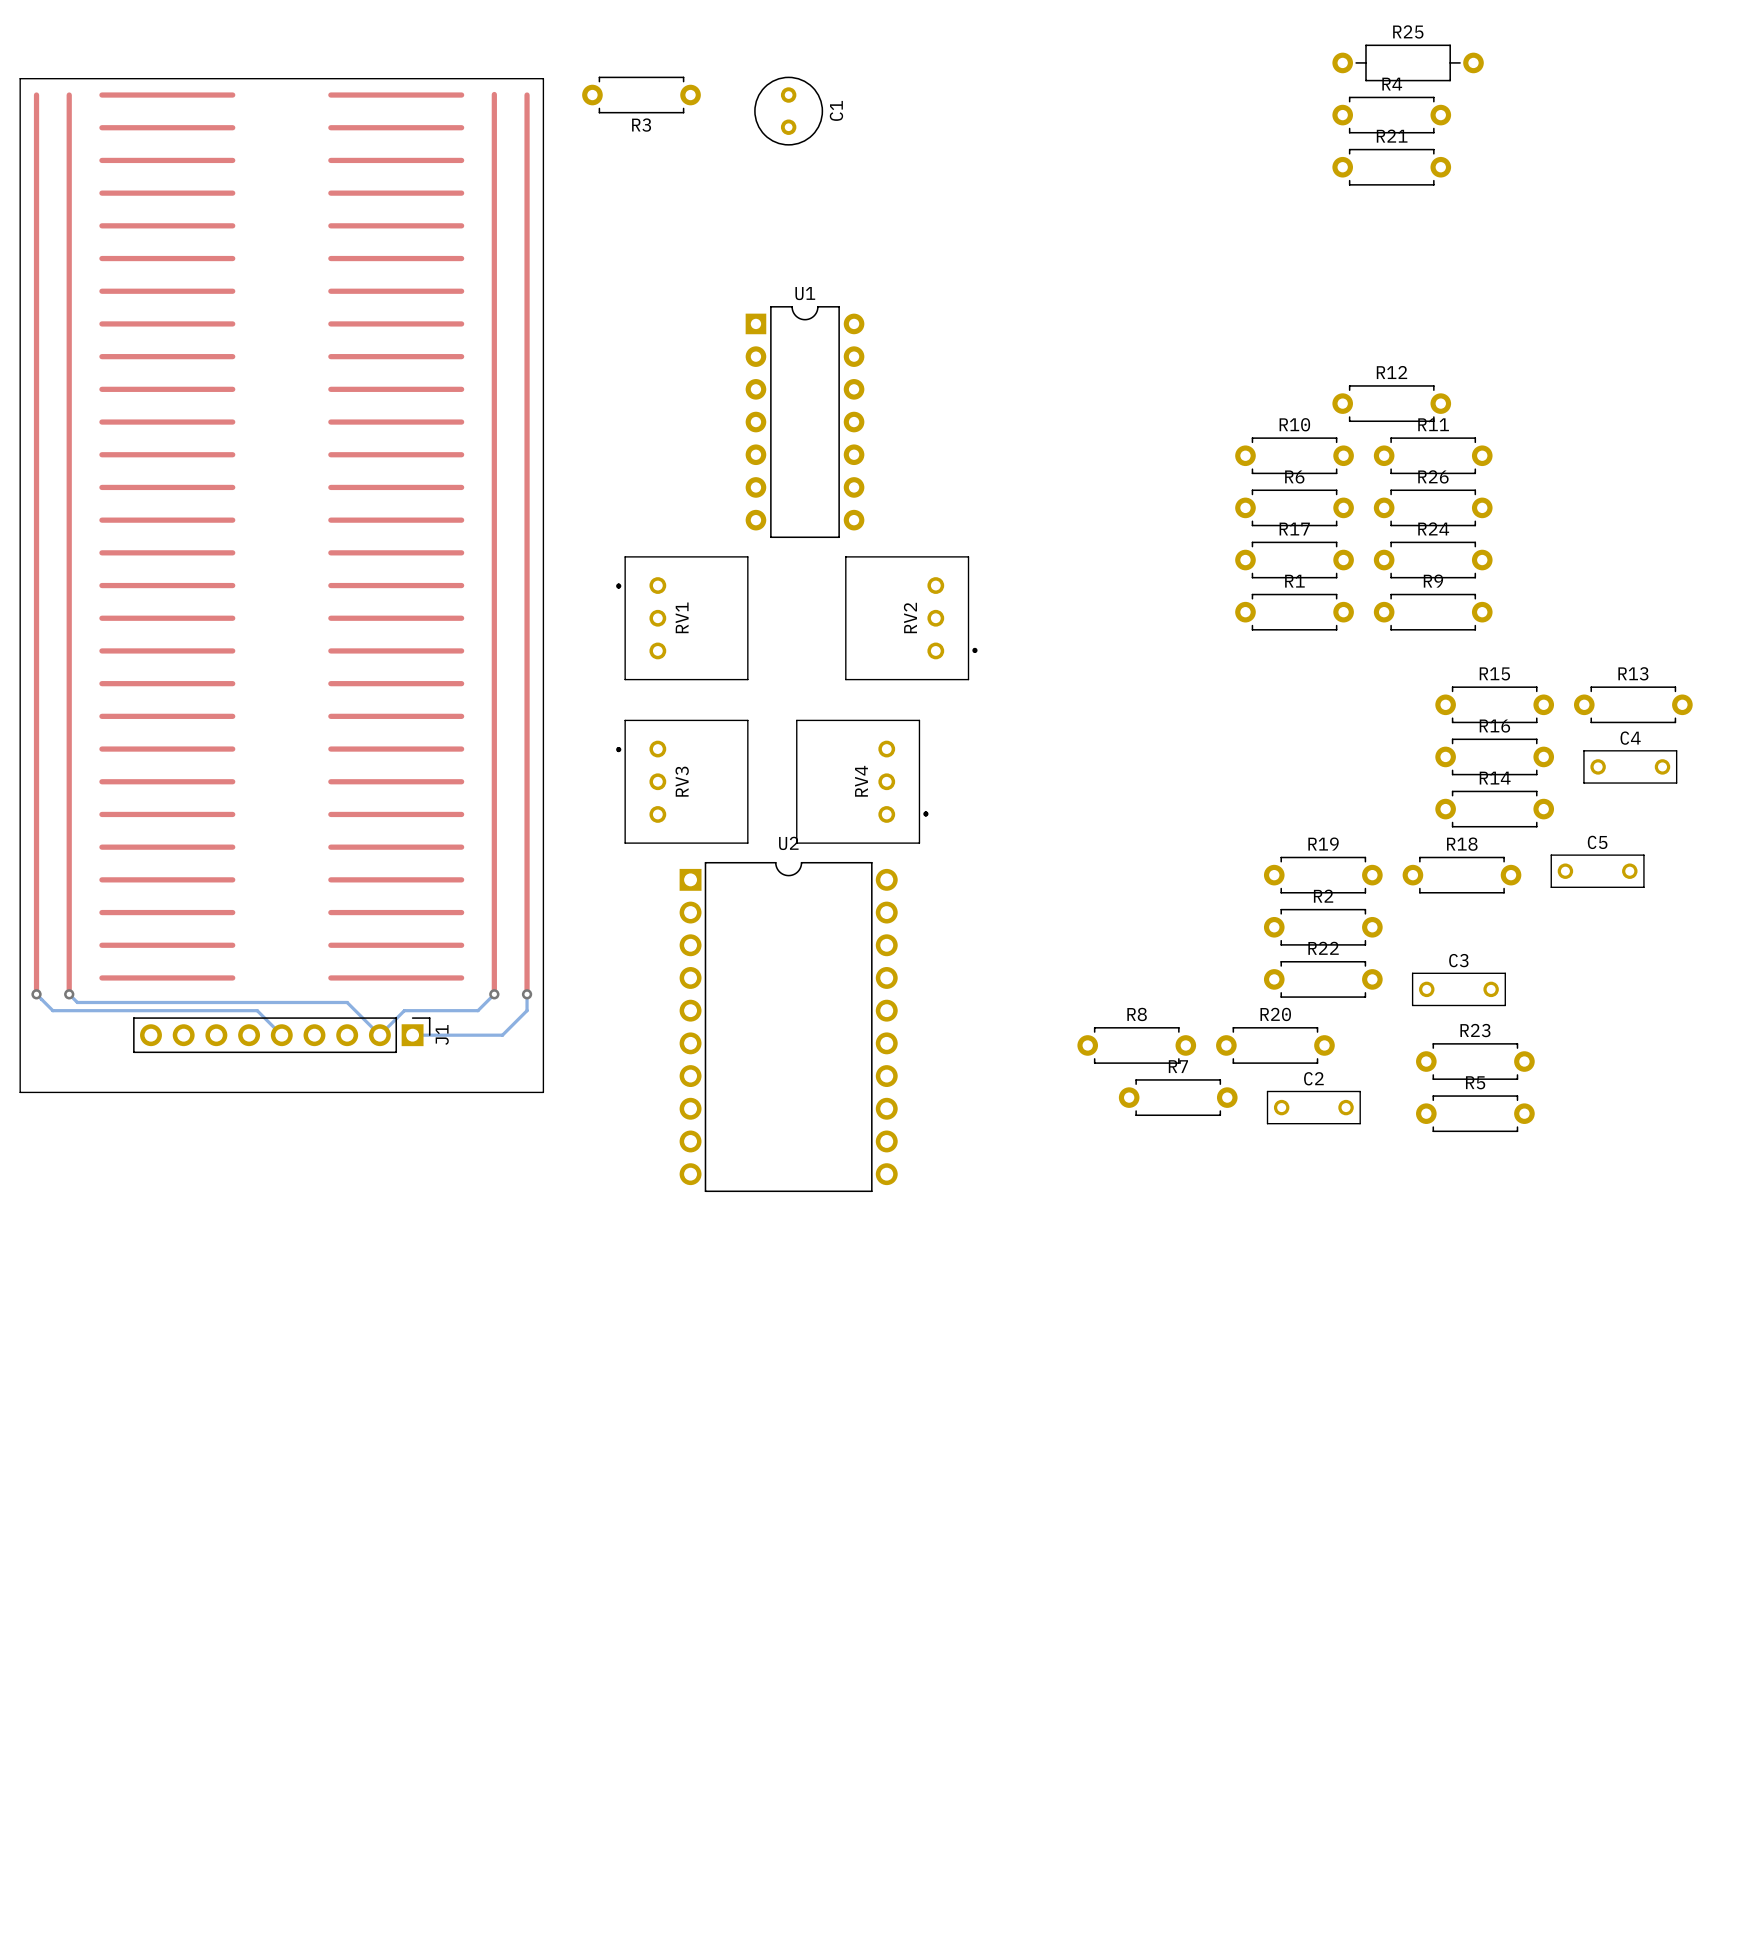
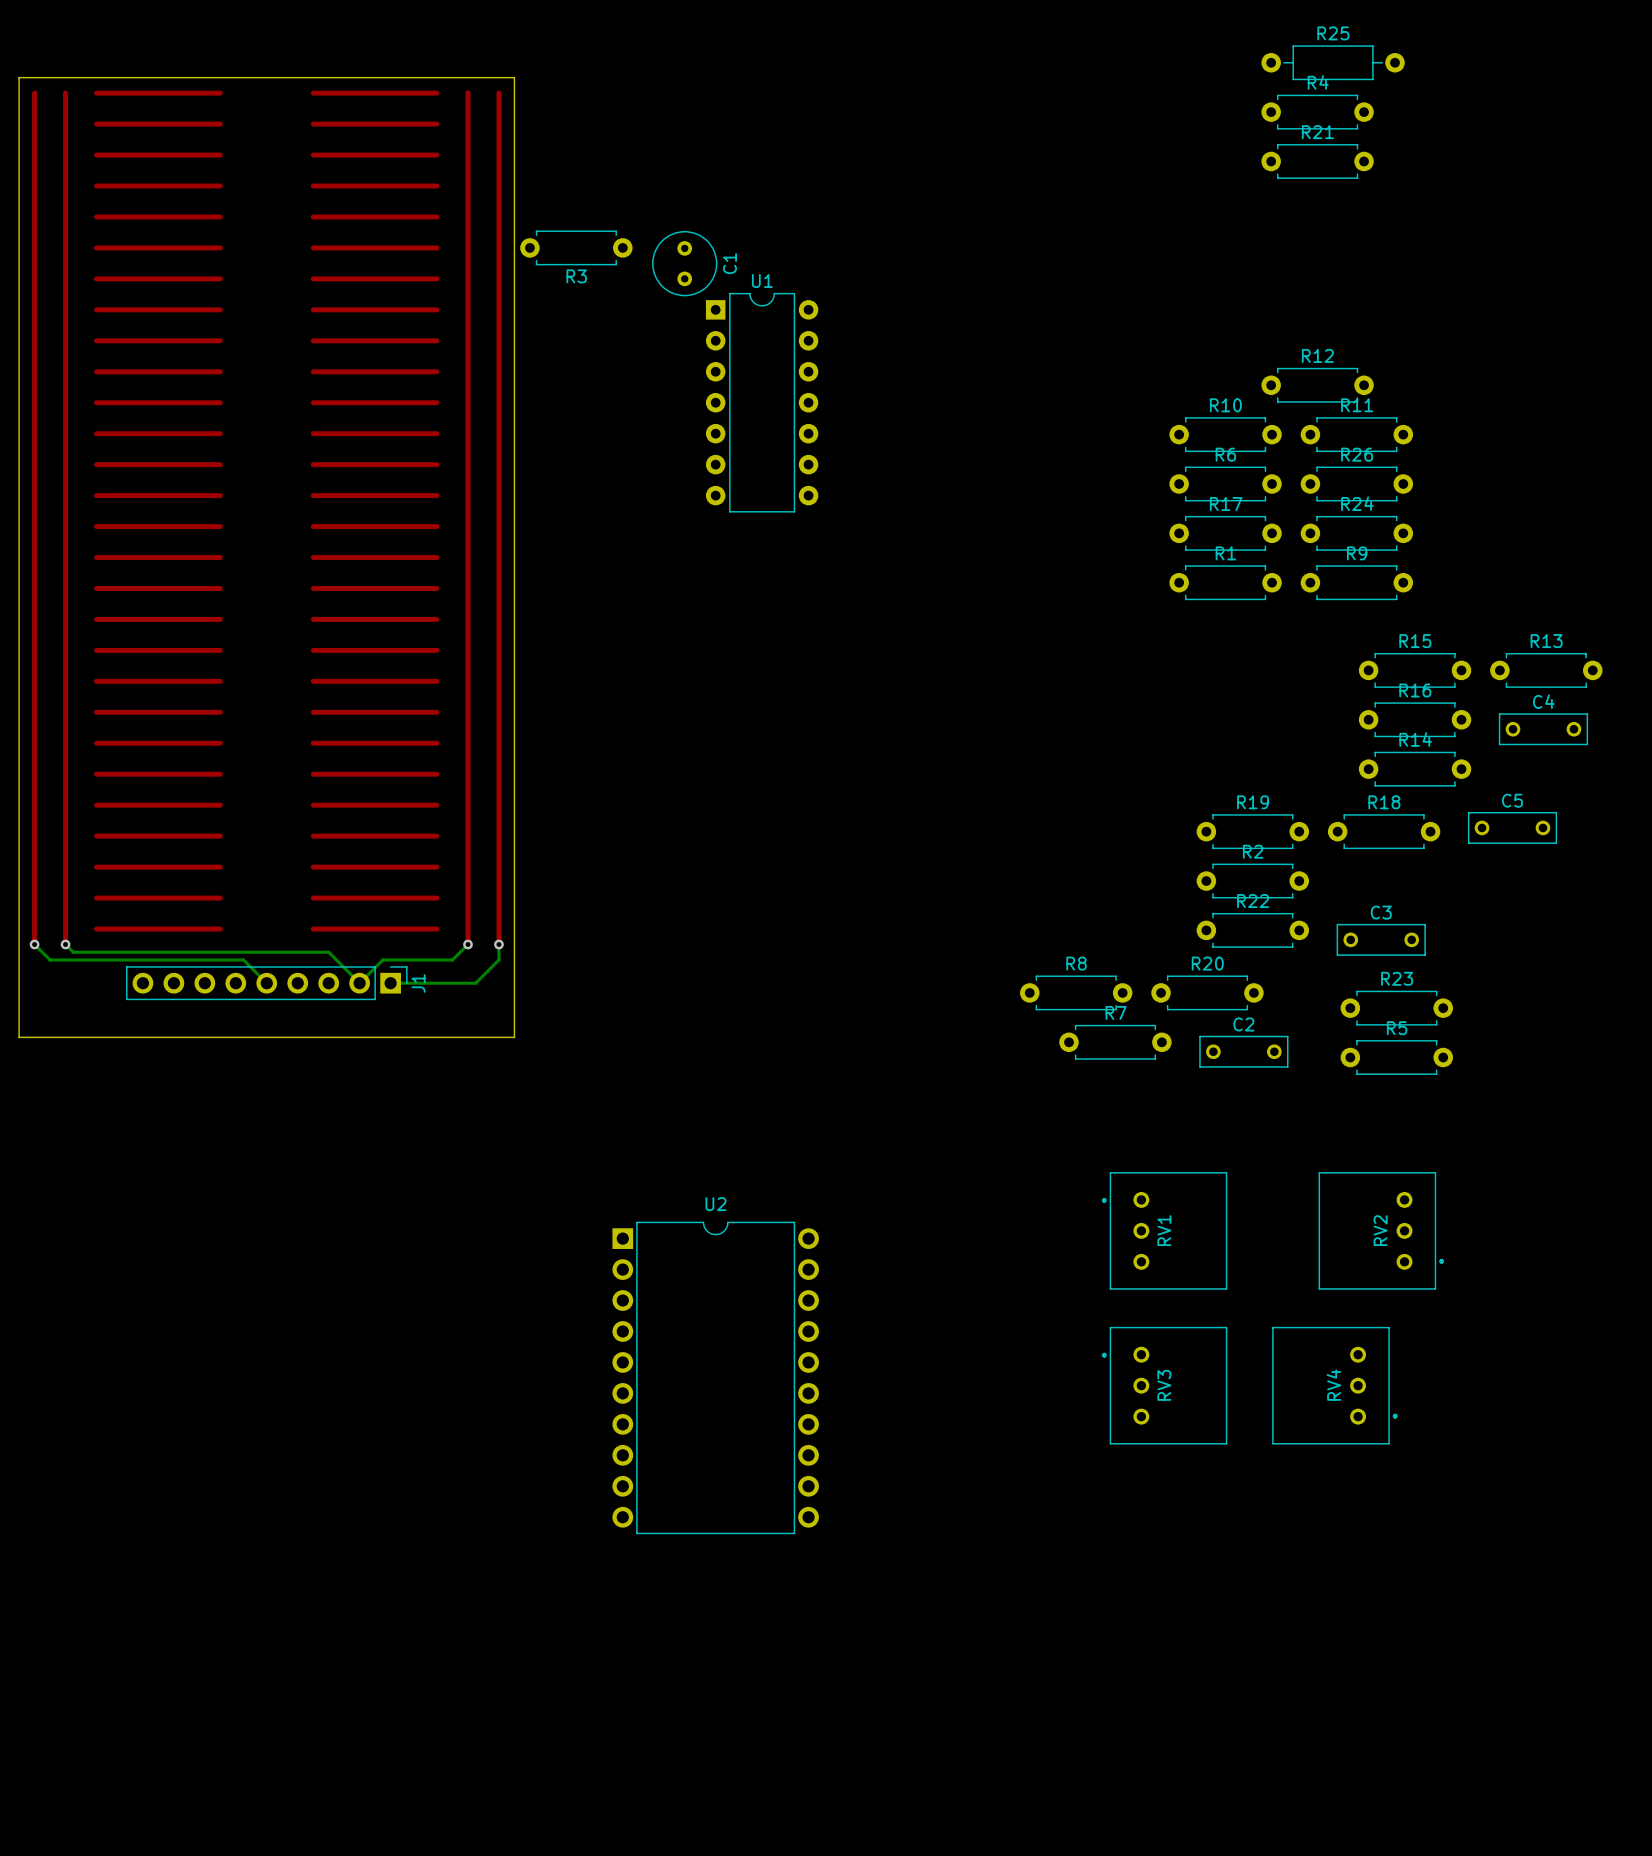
R3 position: (641, 95) -> (576, 247)
C1 position: (788, 111) -> (684, 263)
RV1 position: (682, 618) -> (1164, 1230)
RV2 position: (911, 618) -> (1381, 1230)
RV3 position: (682, 781) -> (1164, 1385)
RV4 position: (862, 781) -> (1334, 1385)
U2 position: (788, 1027) -> (715, 1377)

